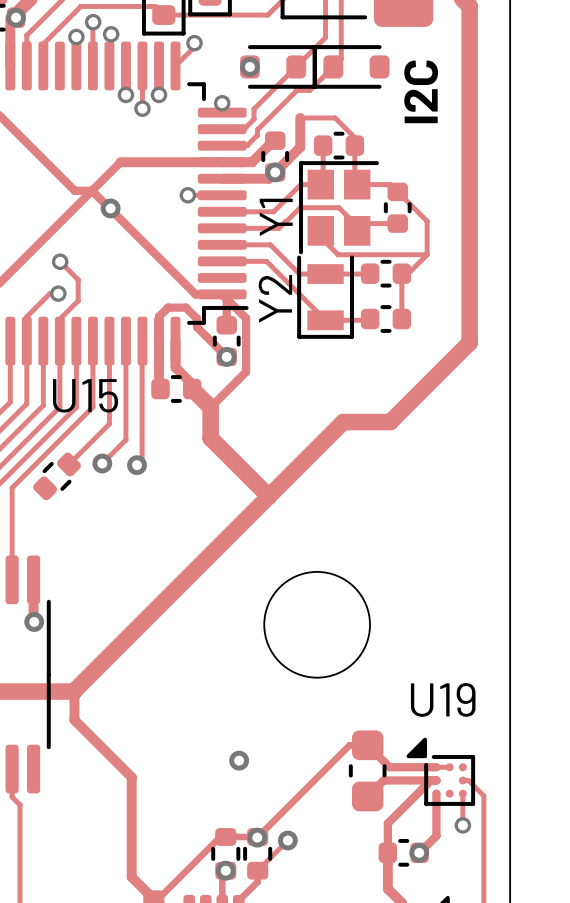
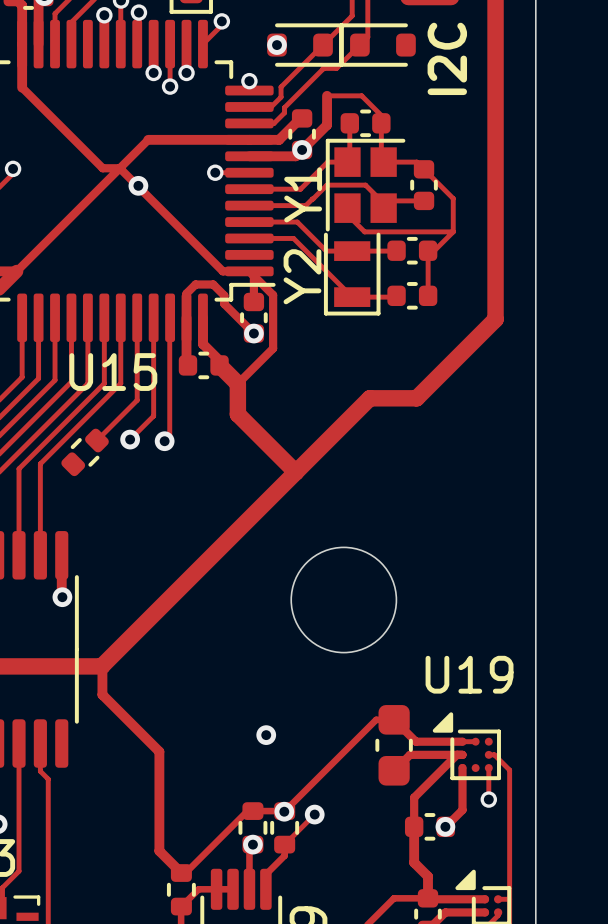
track: (60, 261) (78, 279) (78, 300) (59, 319) (59, 341) -> none
via: (60, 261) -> none
track: (58, 293) (49, 293) (26, 316) (26, 341) -> none
via: (58, 293) -> none

